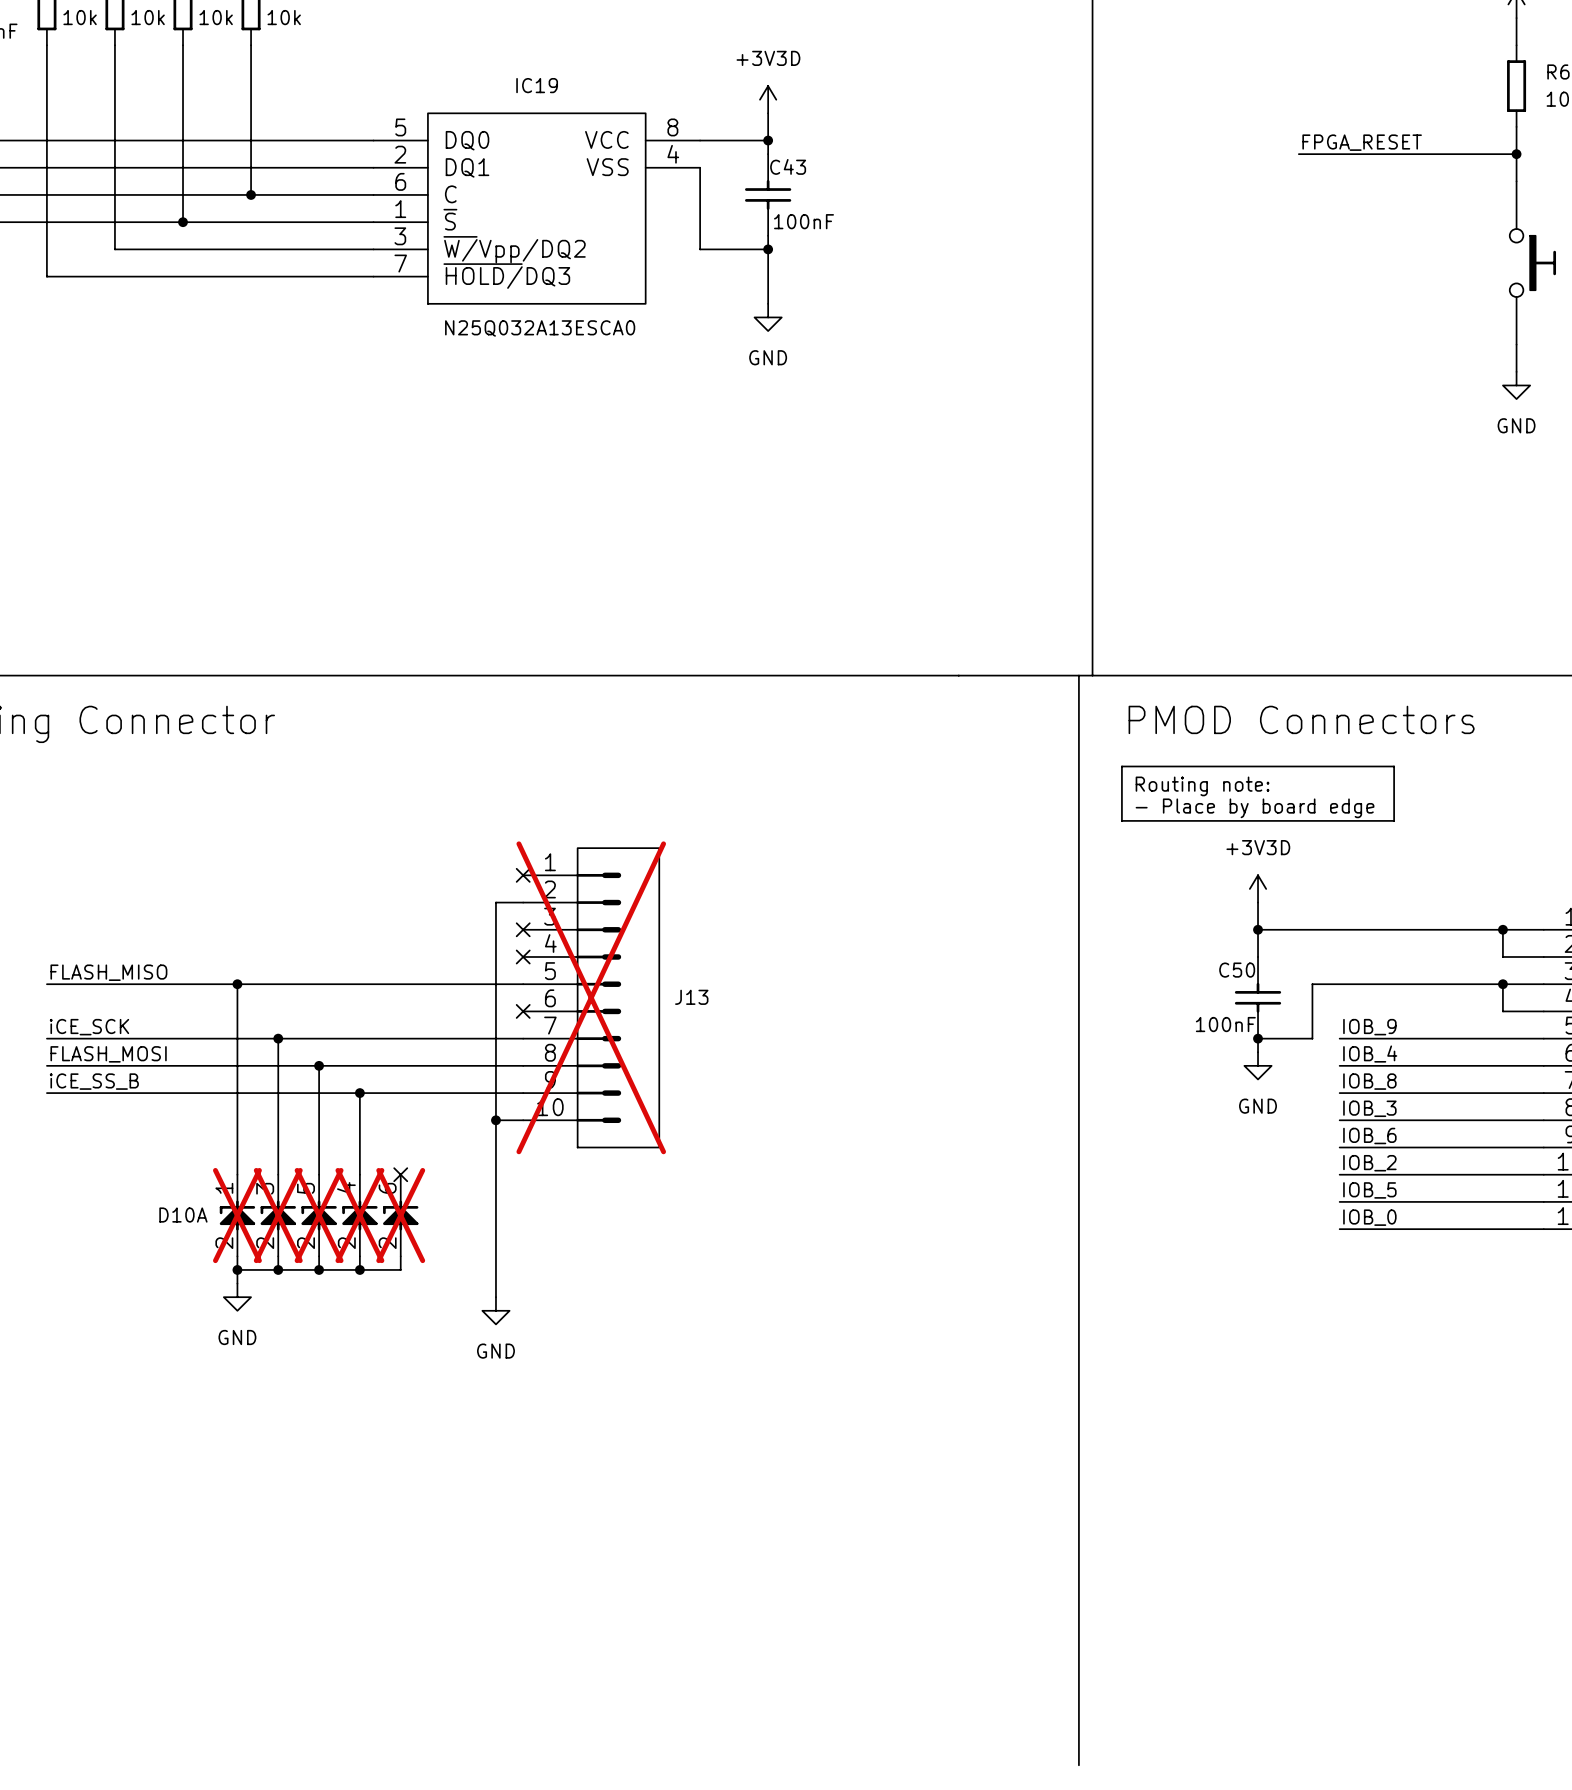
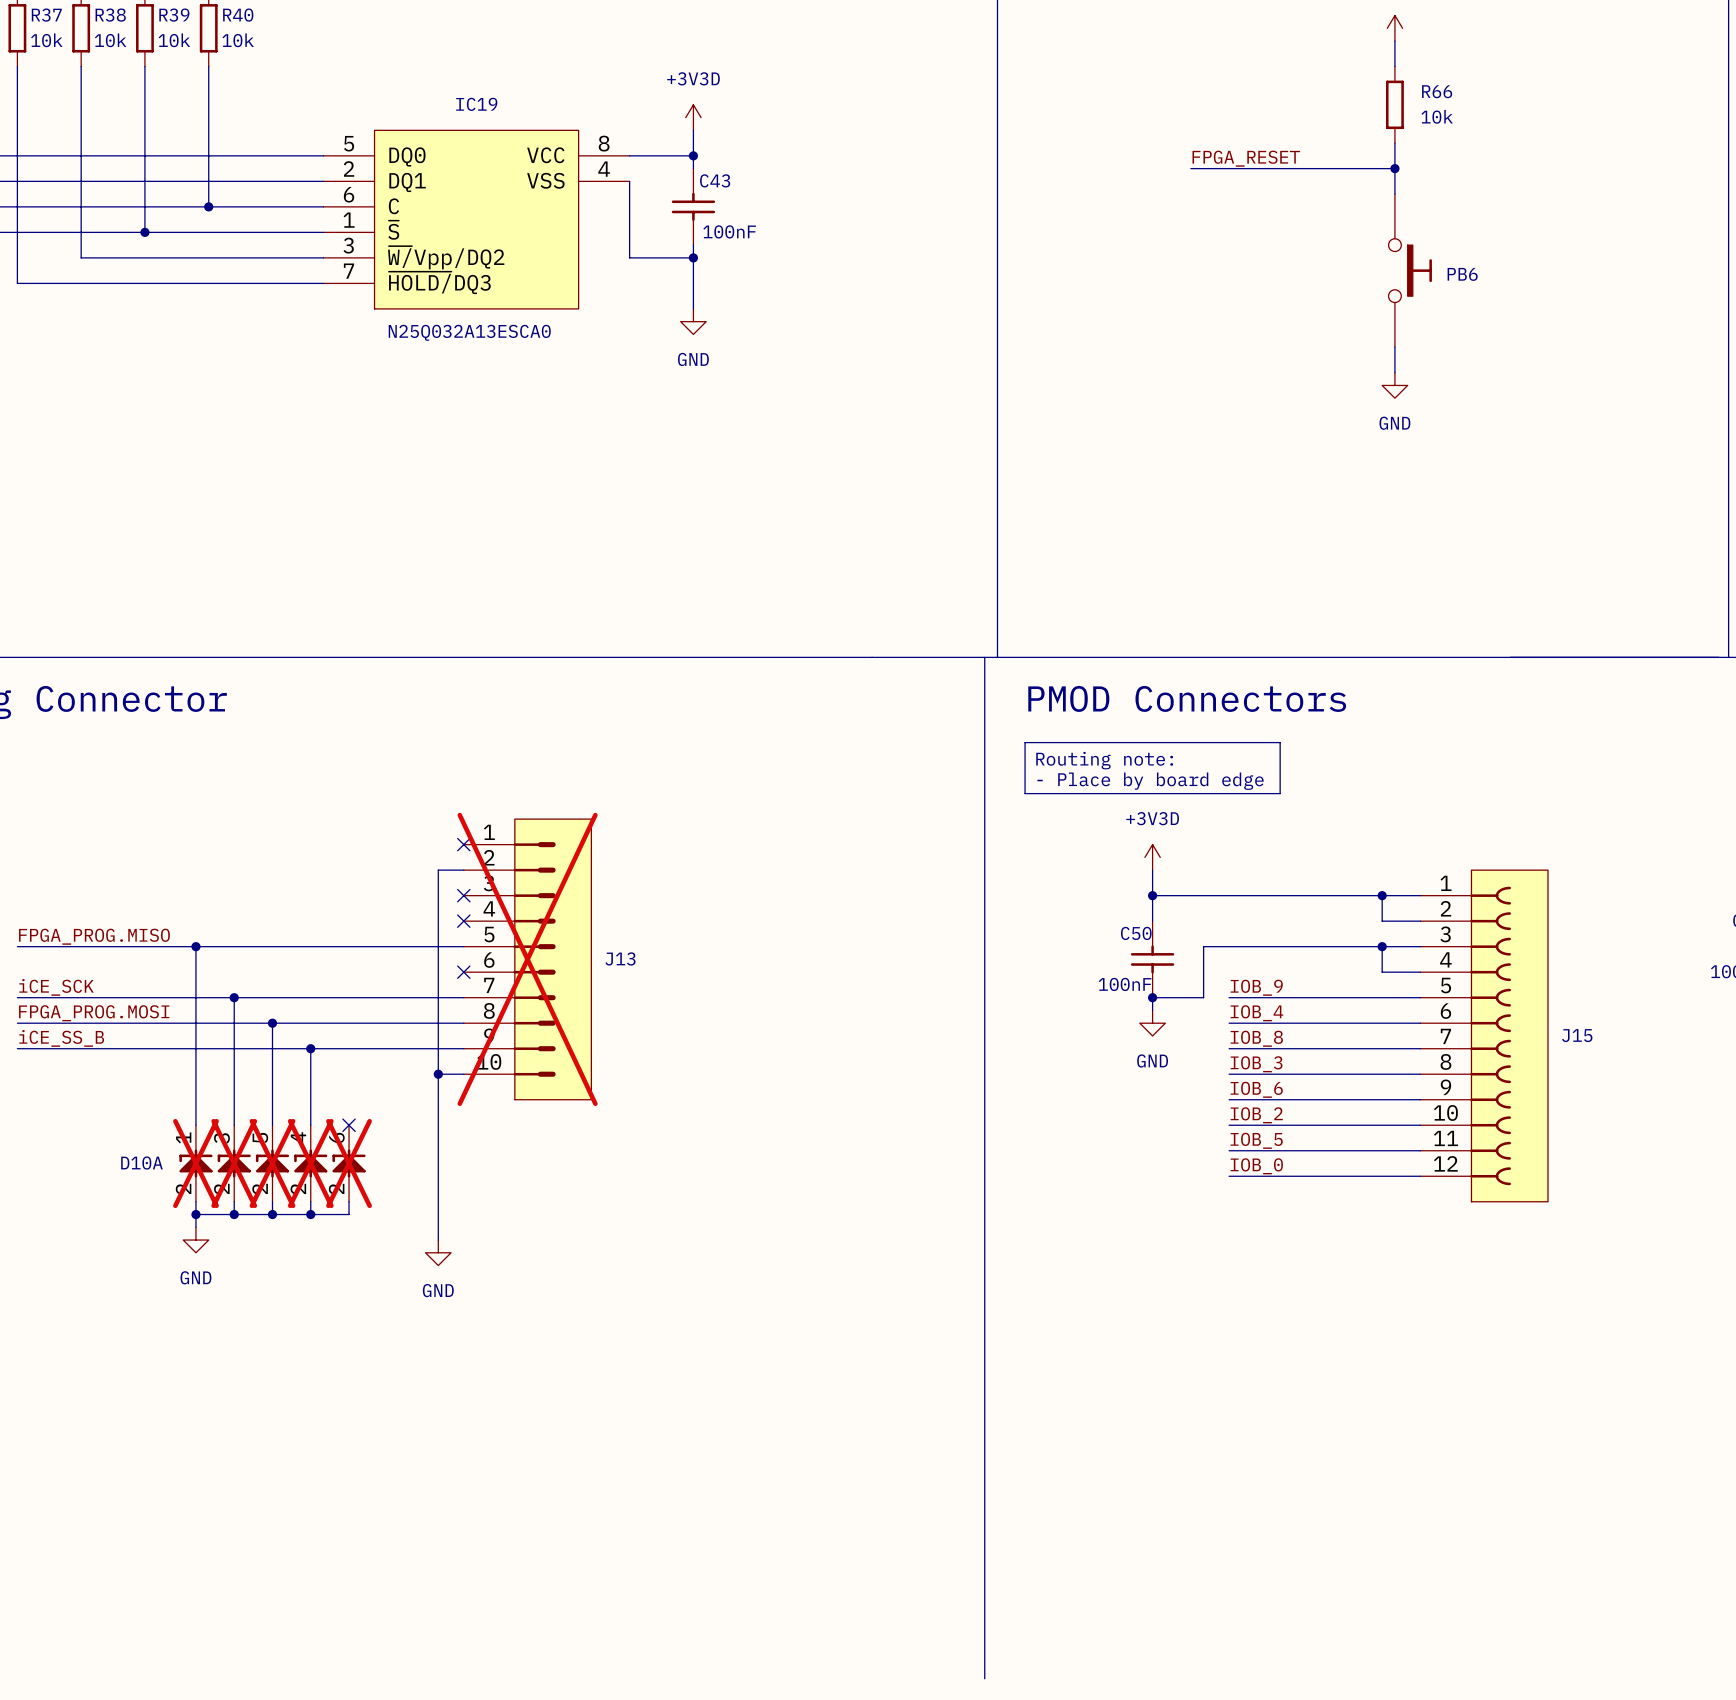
label: FLASH_MISO (108, 972) -> FPGA_PROG.MISO (94, 936)
label: FLASH_MOSI (108, 1054) -> FPGA_PROG.MOSI (94, 1013)

